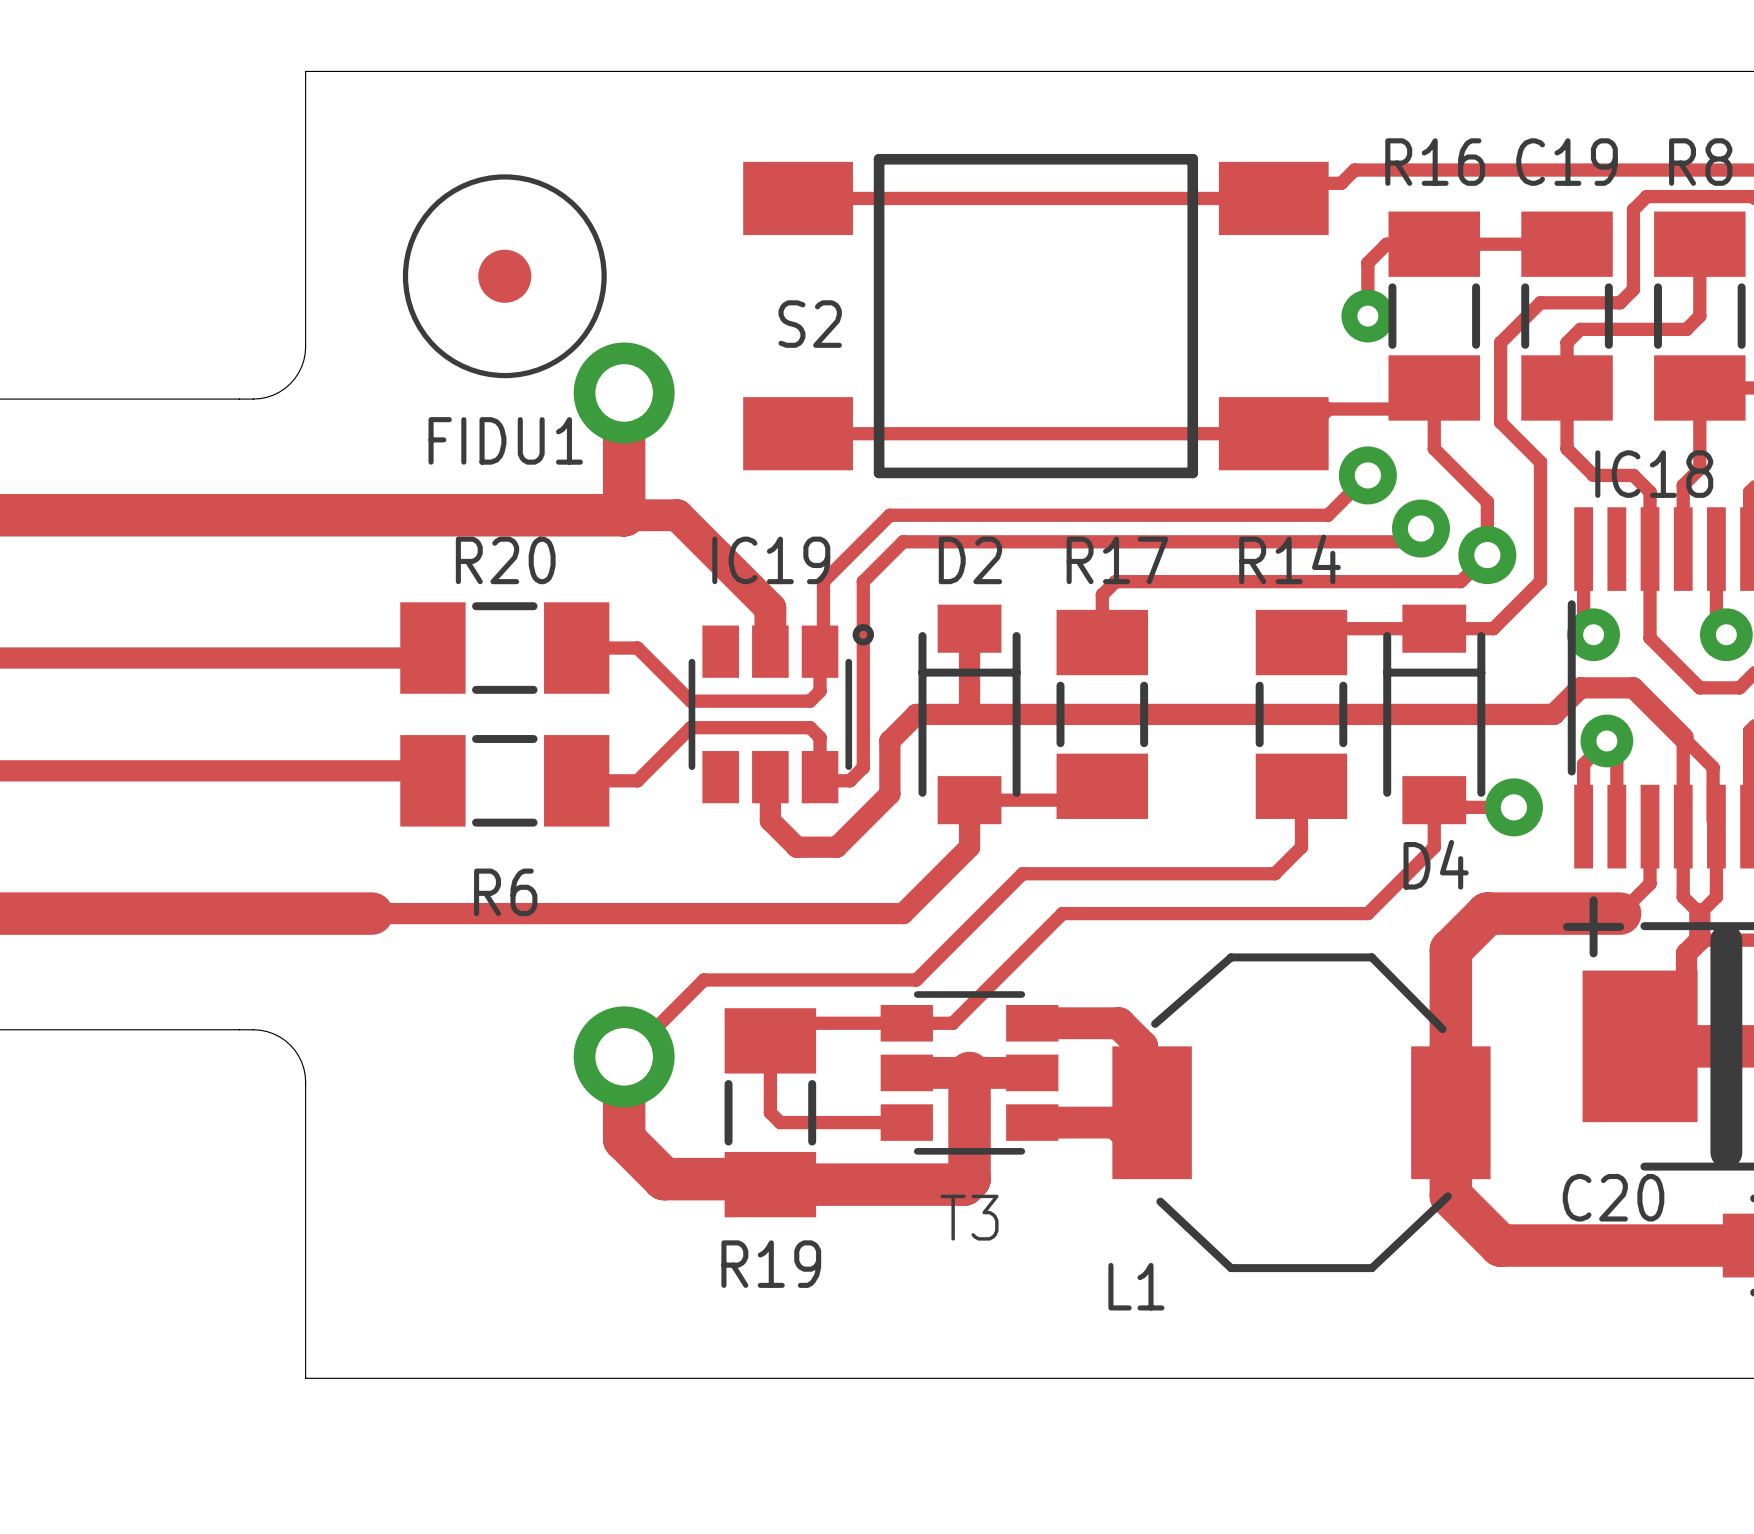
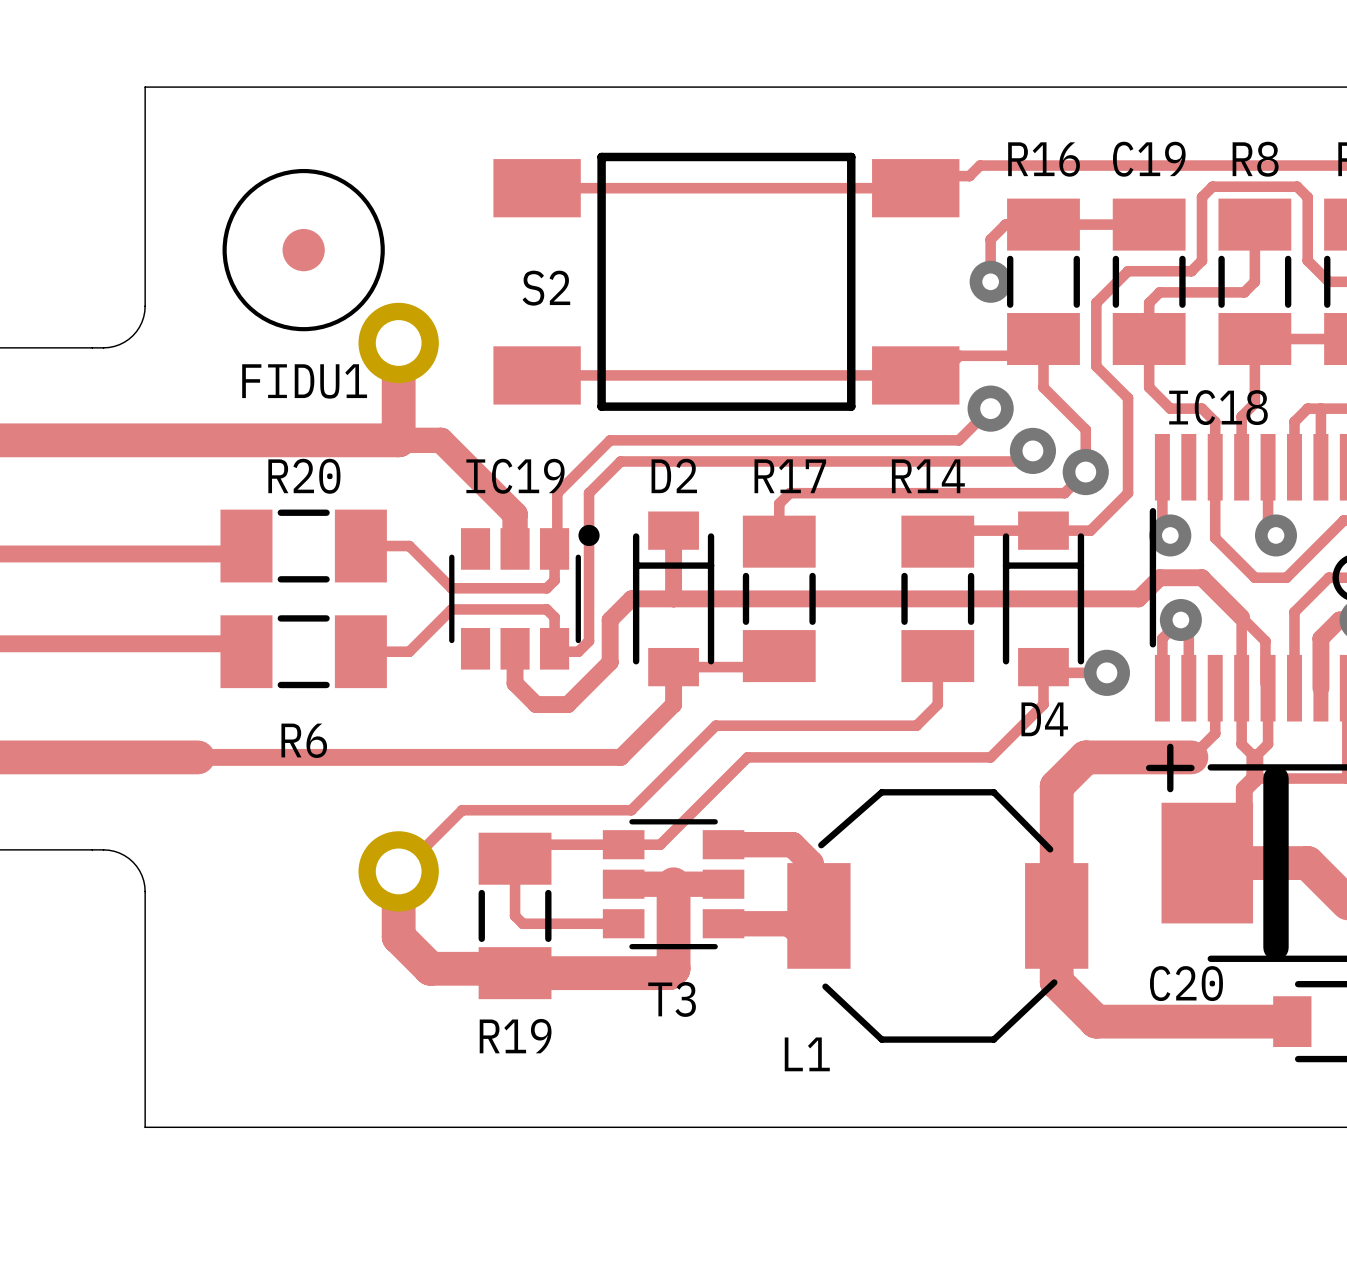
IC19 footprint: [688, 624, 875, 804] -> [449, 524, 600, 670]

